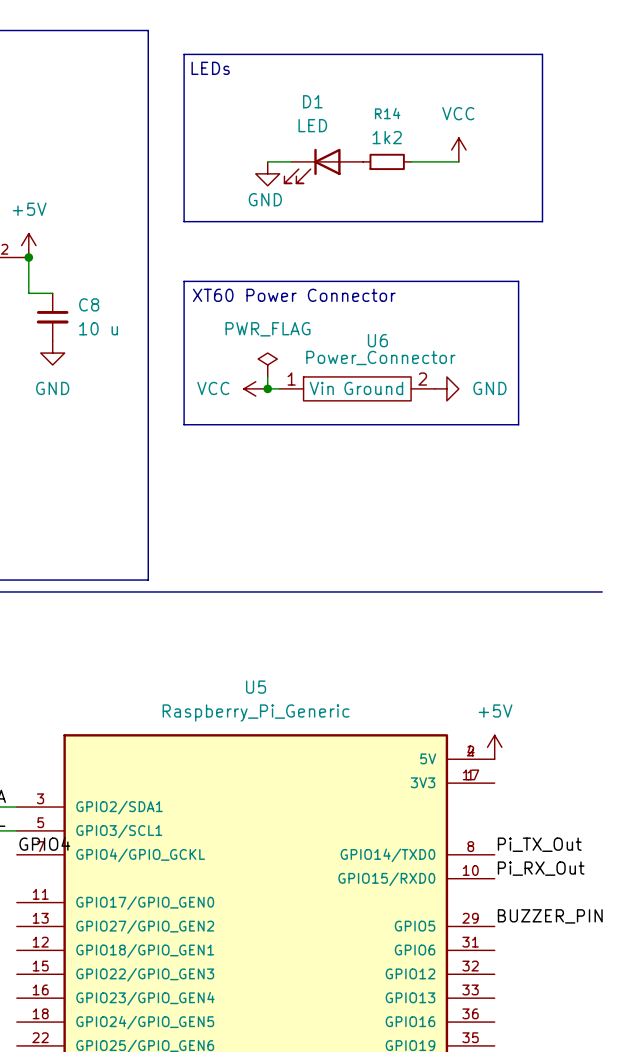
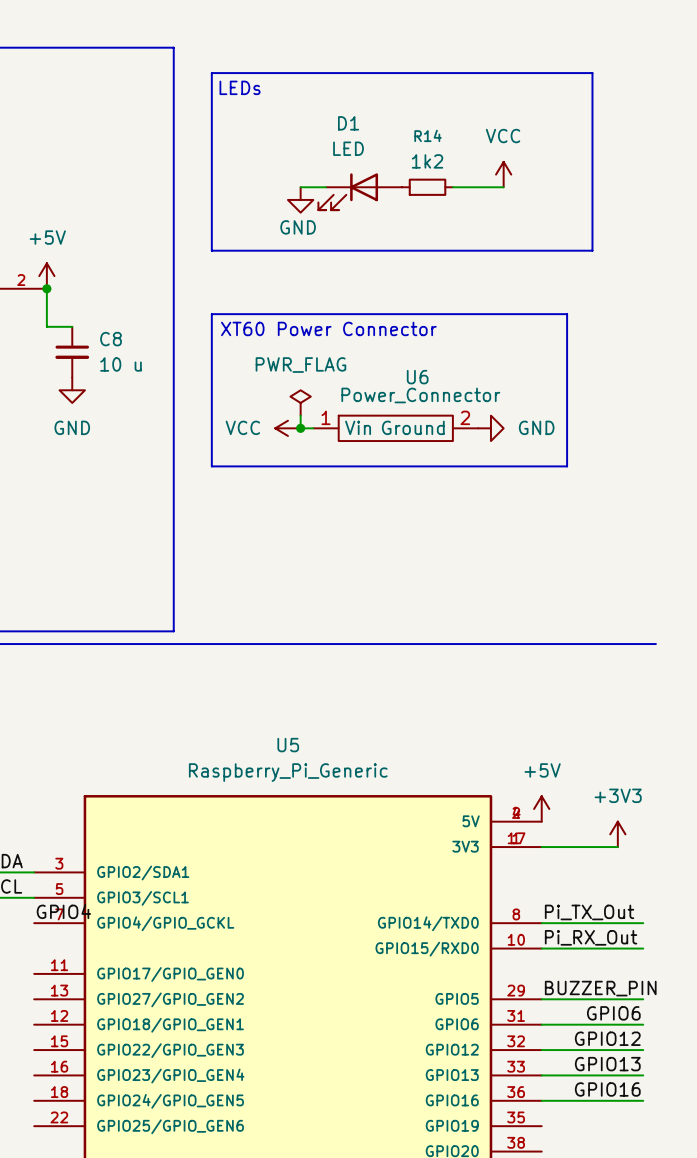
power symbol: none -> +3V3 (617, 834)
wire: none -> (541, 847) (617, 847)
wire: none -> (541, 923) (643, 923)
wire: none -> (541, 948) (643, 948)
wire: none -> (541, 999) (643, 999)
label: none -> GPIO6 (613, 1013)
wire: none -> (541, 1024) (643, 1024)
label: none -> GPIO12 (607, 1038)
wire: none -> (541, 1050) (643, 1050)
label: none -> GPIO13 (607, 1064)
wire: none -> (541, 1075) (643, 1075)
label: none -> GPIO16 (607, 1089)
wire: none -> (541, 1100) (643, 1100)

